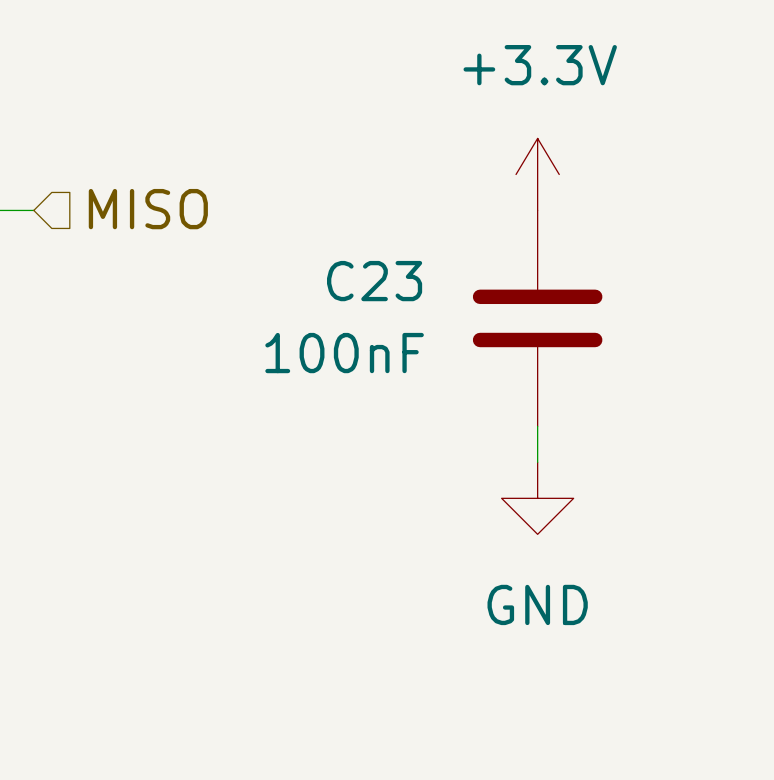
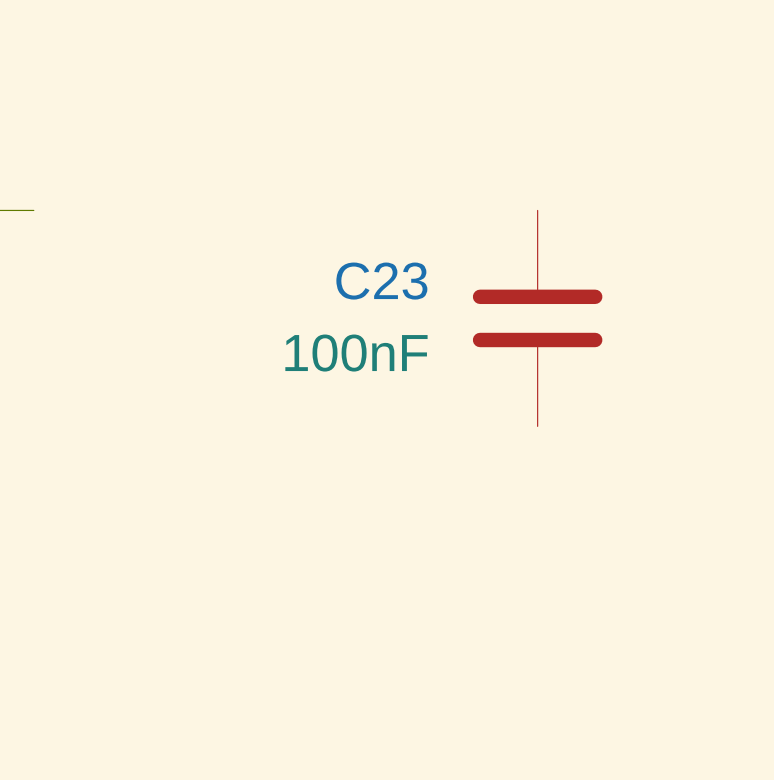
power symbol: +3.3V (537, 174) -> none
hierarchical label: MISO (148, 209) -> none
wire: (537, 426) (537, 462) -> none
power symbol: GND (537, 498) -> none

